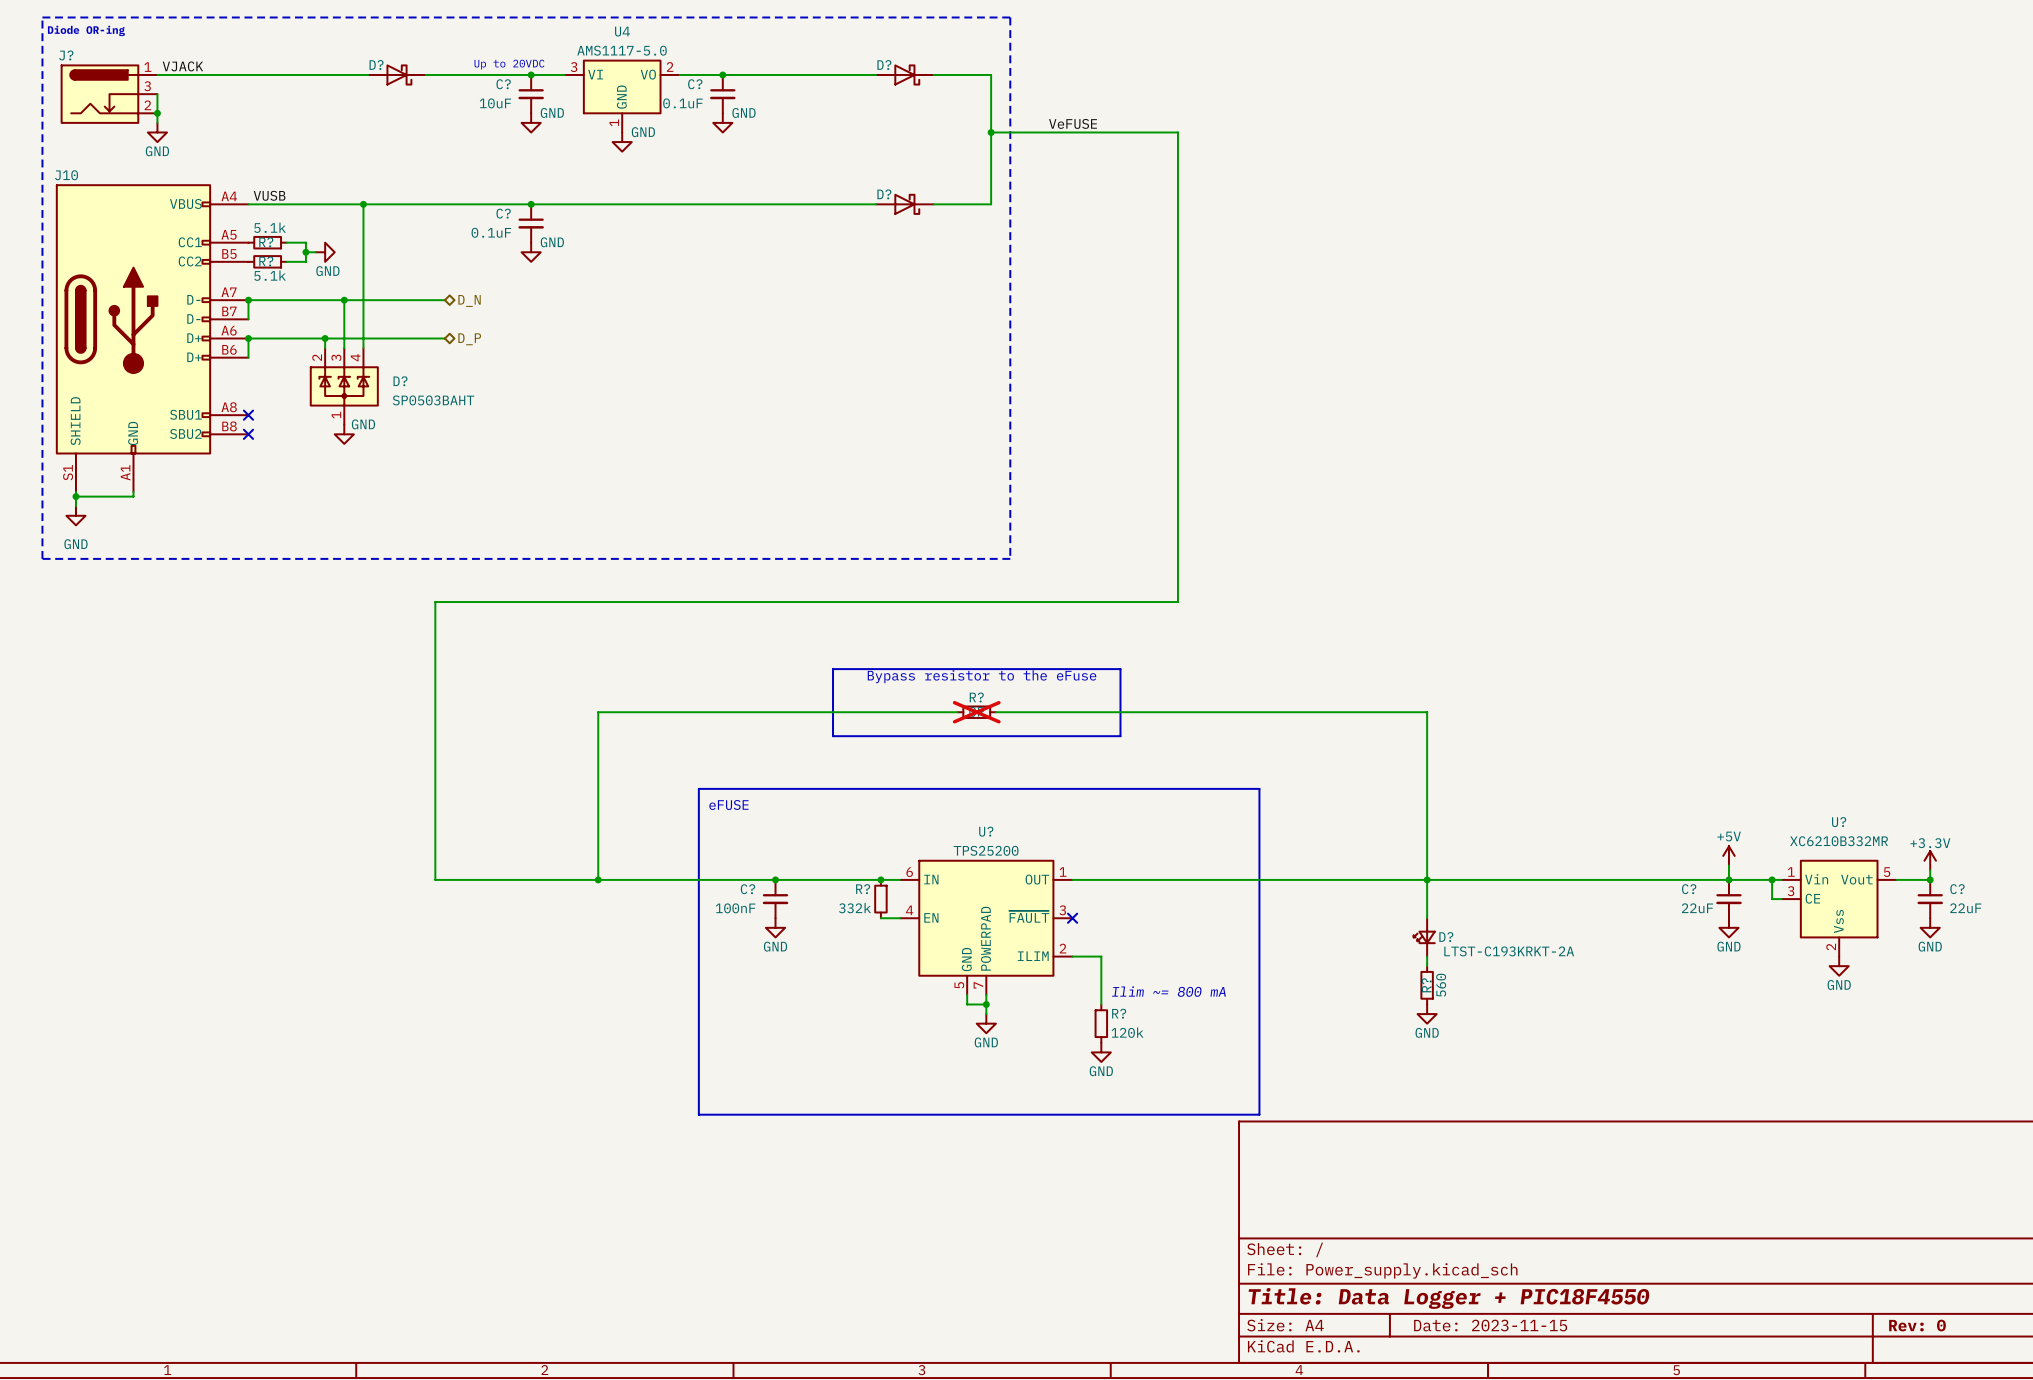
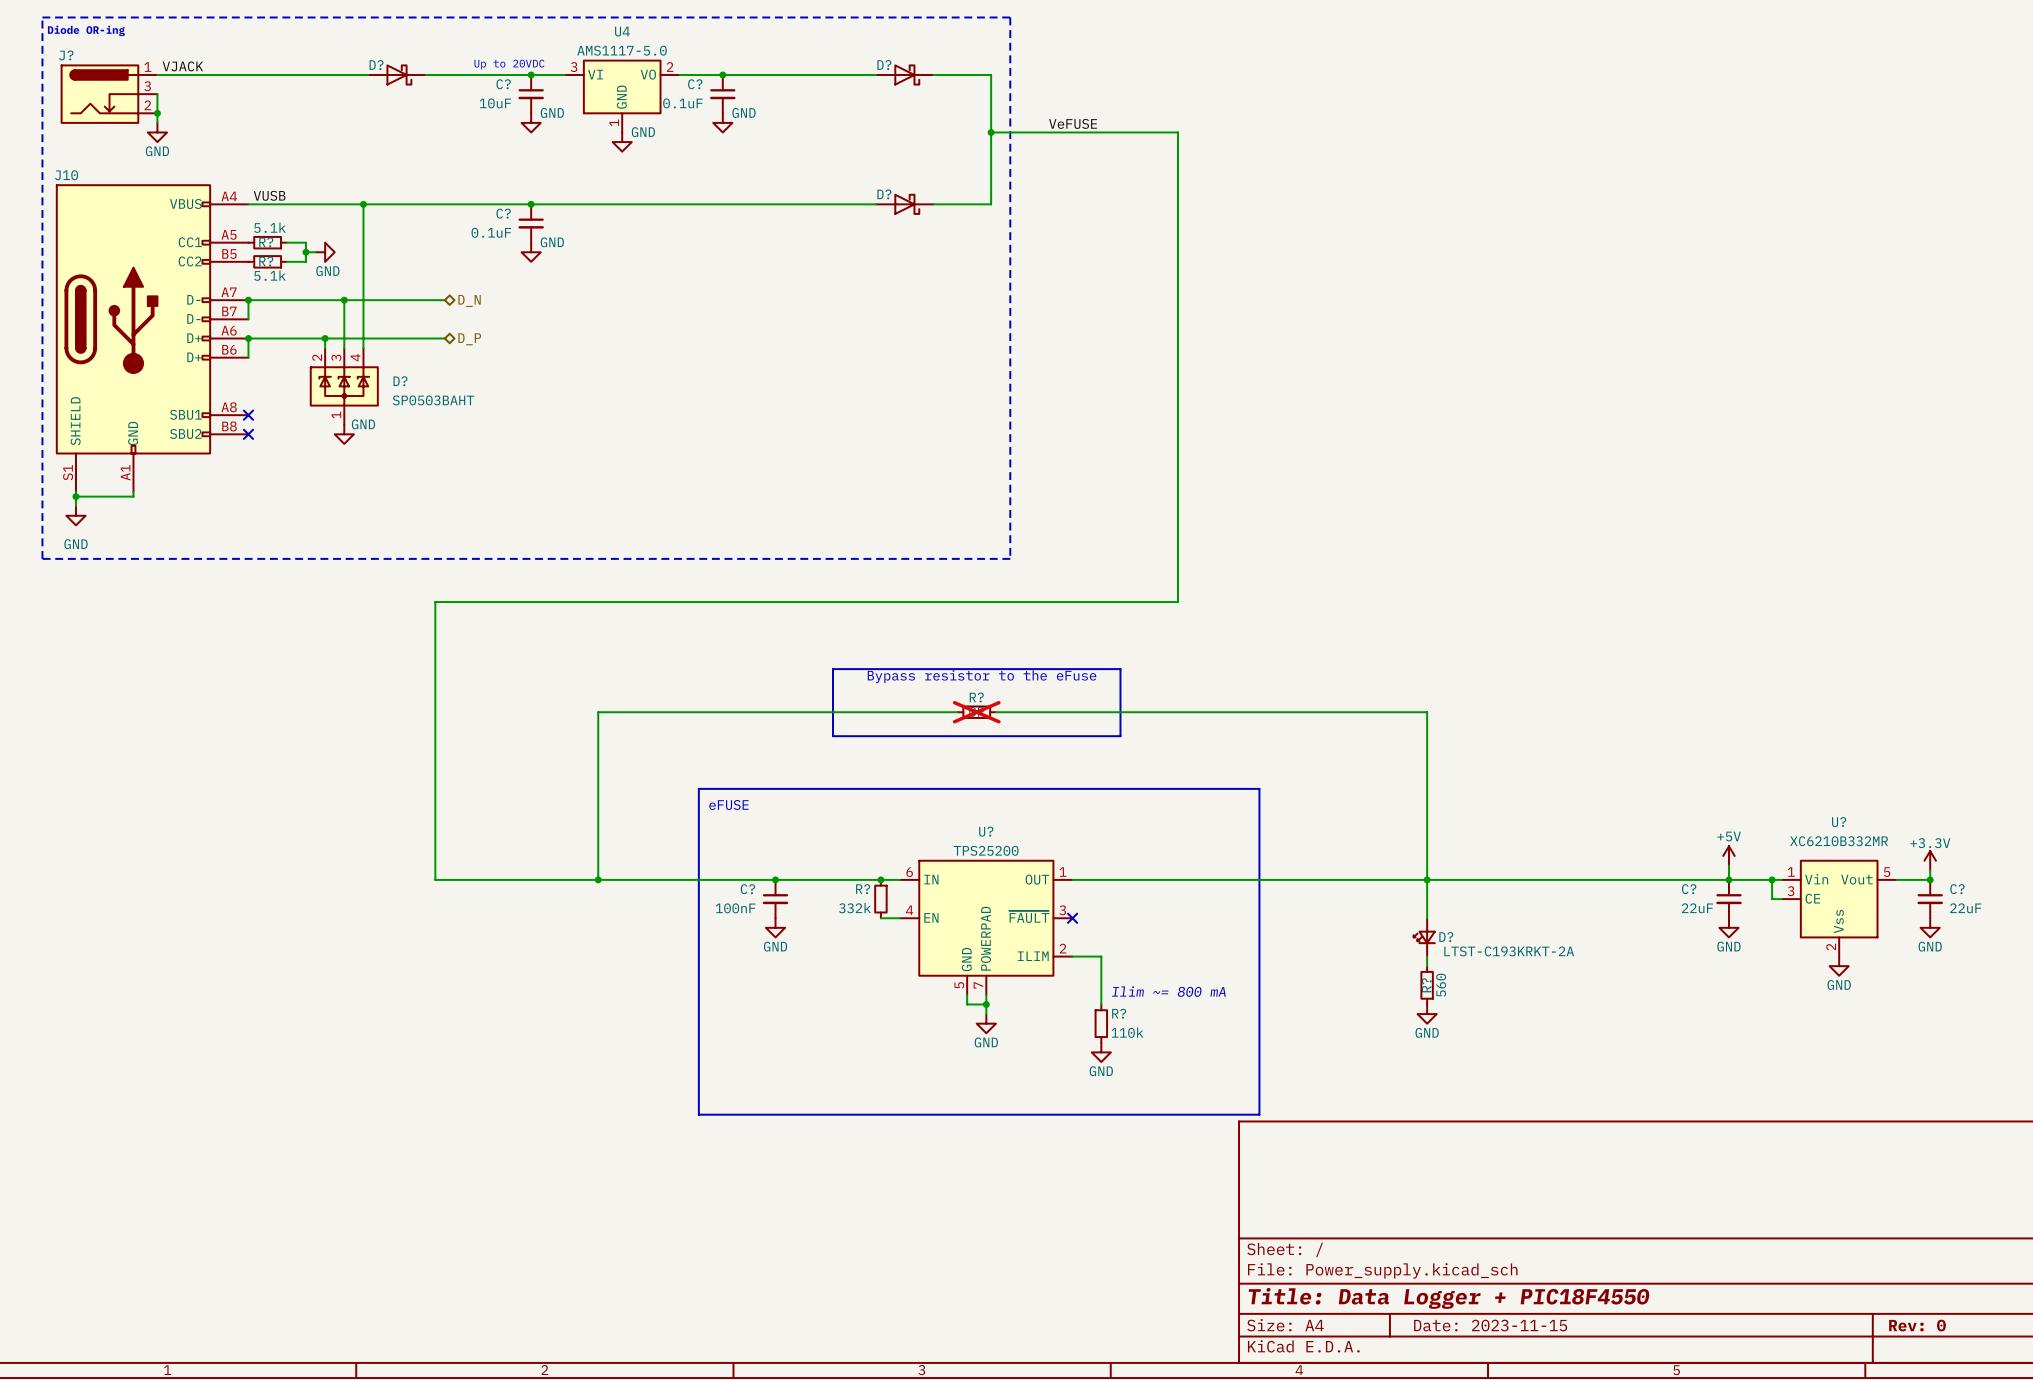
R? value: 120k (1127, 1032) -> 110k (1127, 1032)

